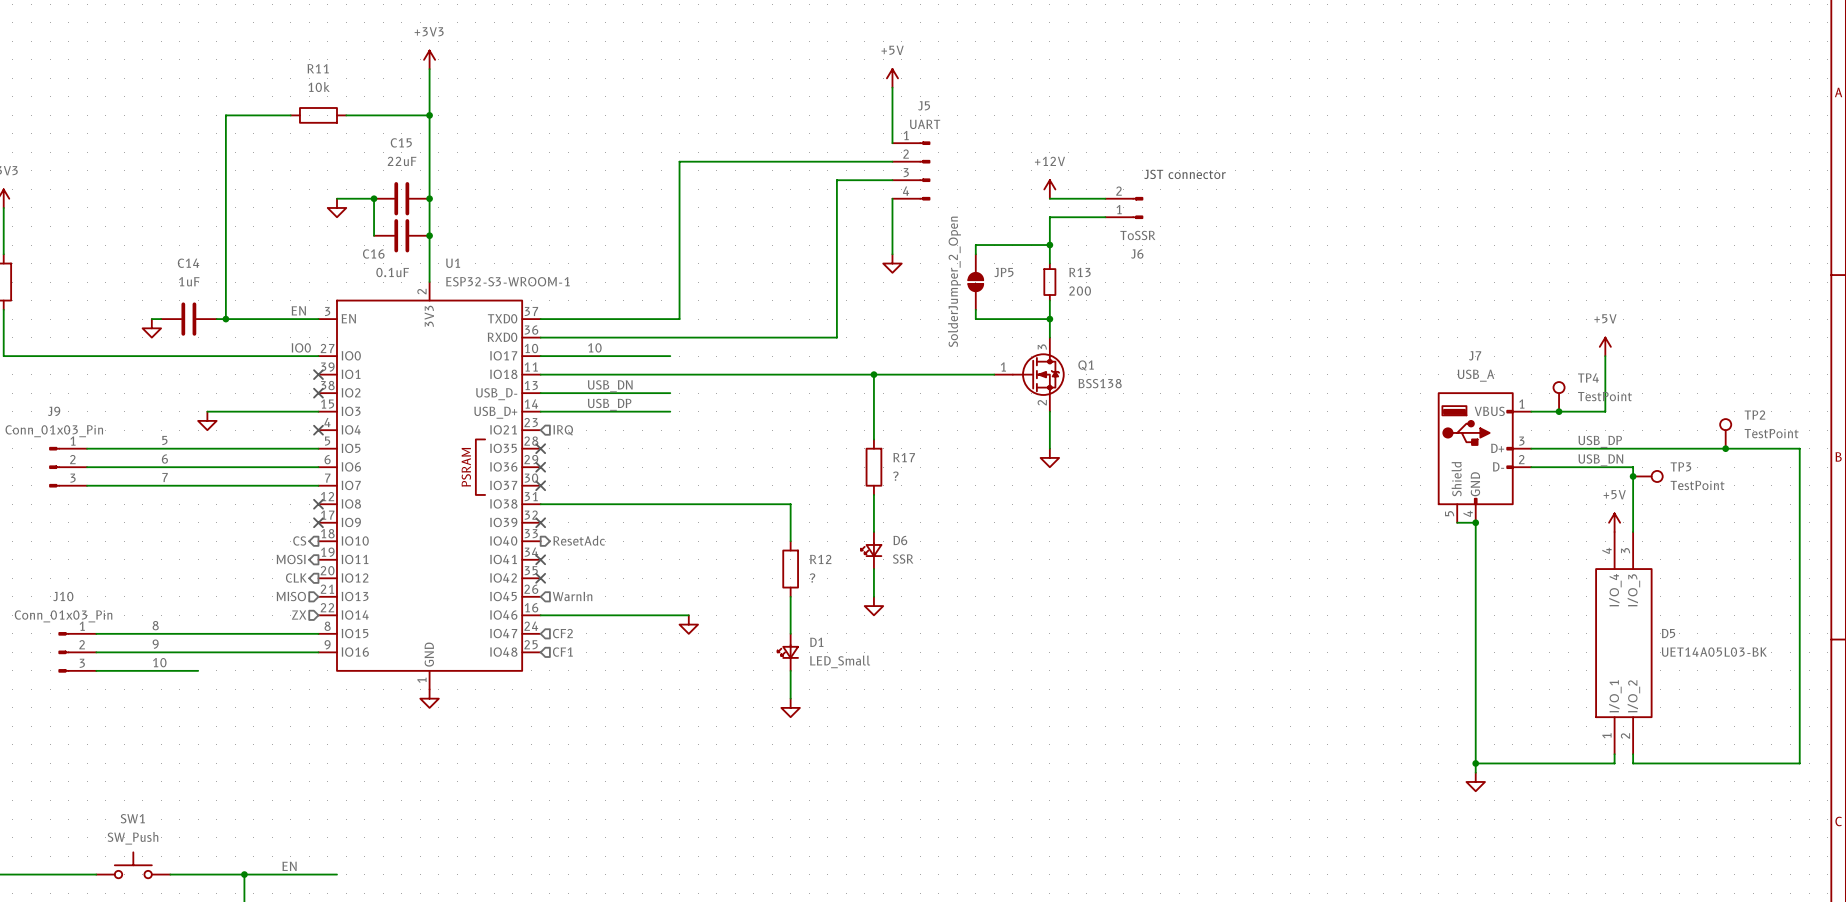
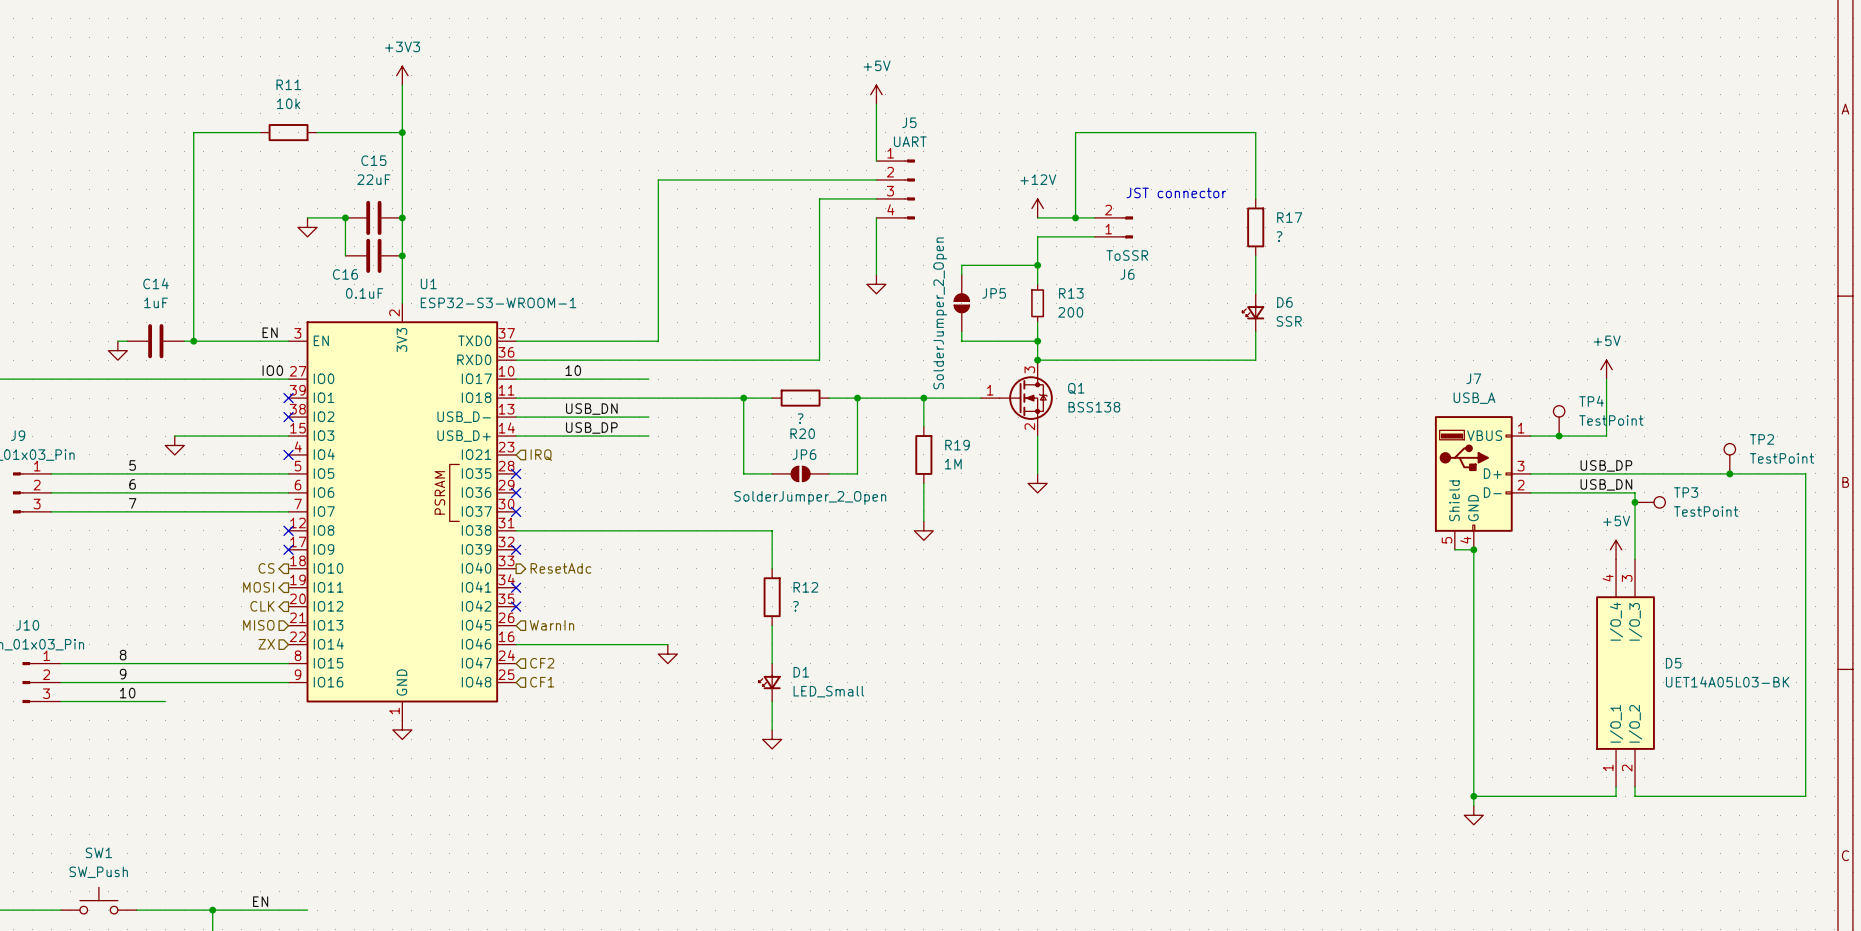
wire: none -> (1255, 198) (1255, 132) (1075, 132) (1075, 217)
junction: none -> (1075, 217)
wire: none -> (1255, 255) (1255, 293)
wire: none -> (1255, 331) (1255, 360) (1037, 360)
junction: none -> (1037, 360)
wire: none -> (743, 398) (743, 473) (772, 473)
junction: none -> (743, 398)
wire: (790, 374) (846, 374) -> none
R20: none -> ? (800, 398)
wire: none -> (923, 398) (923, 426)
junction: none -> (923, 398)
R19: none -> 1M (923, 454)
wire: none -> (857, 464) (857, 473) (829, 473)
JP6: none -> SolderJumper_2_Open (800, 473)
R17 position: (873, 467) -> (1255, 227)
wire: (873, 494) (873, 532) -> (923, 483) (923, 521)
D6 position: (871, 550) -> (1253, 312)
wire: (873, 569) (873, 596) -> none
power symbol position: (873, 606) -> (923, 530)

